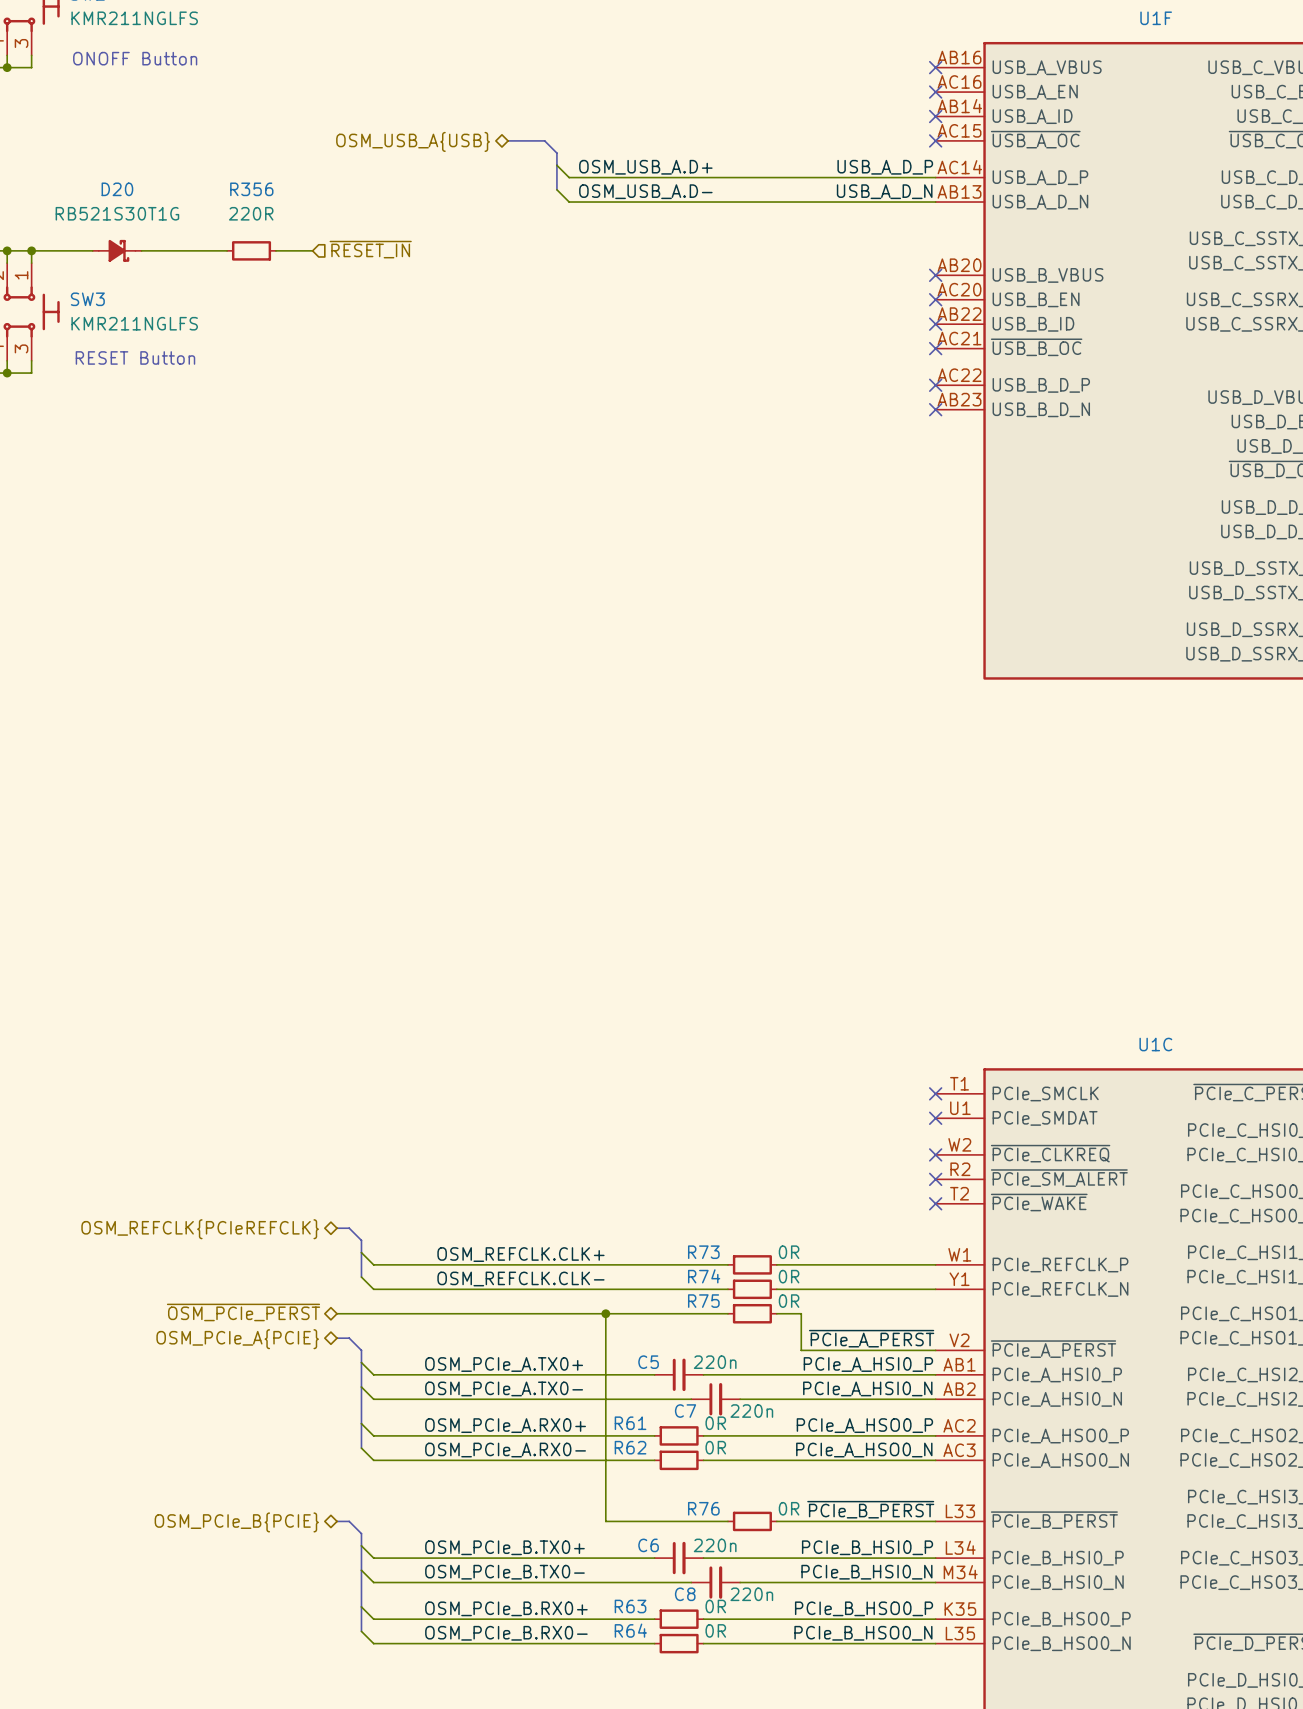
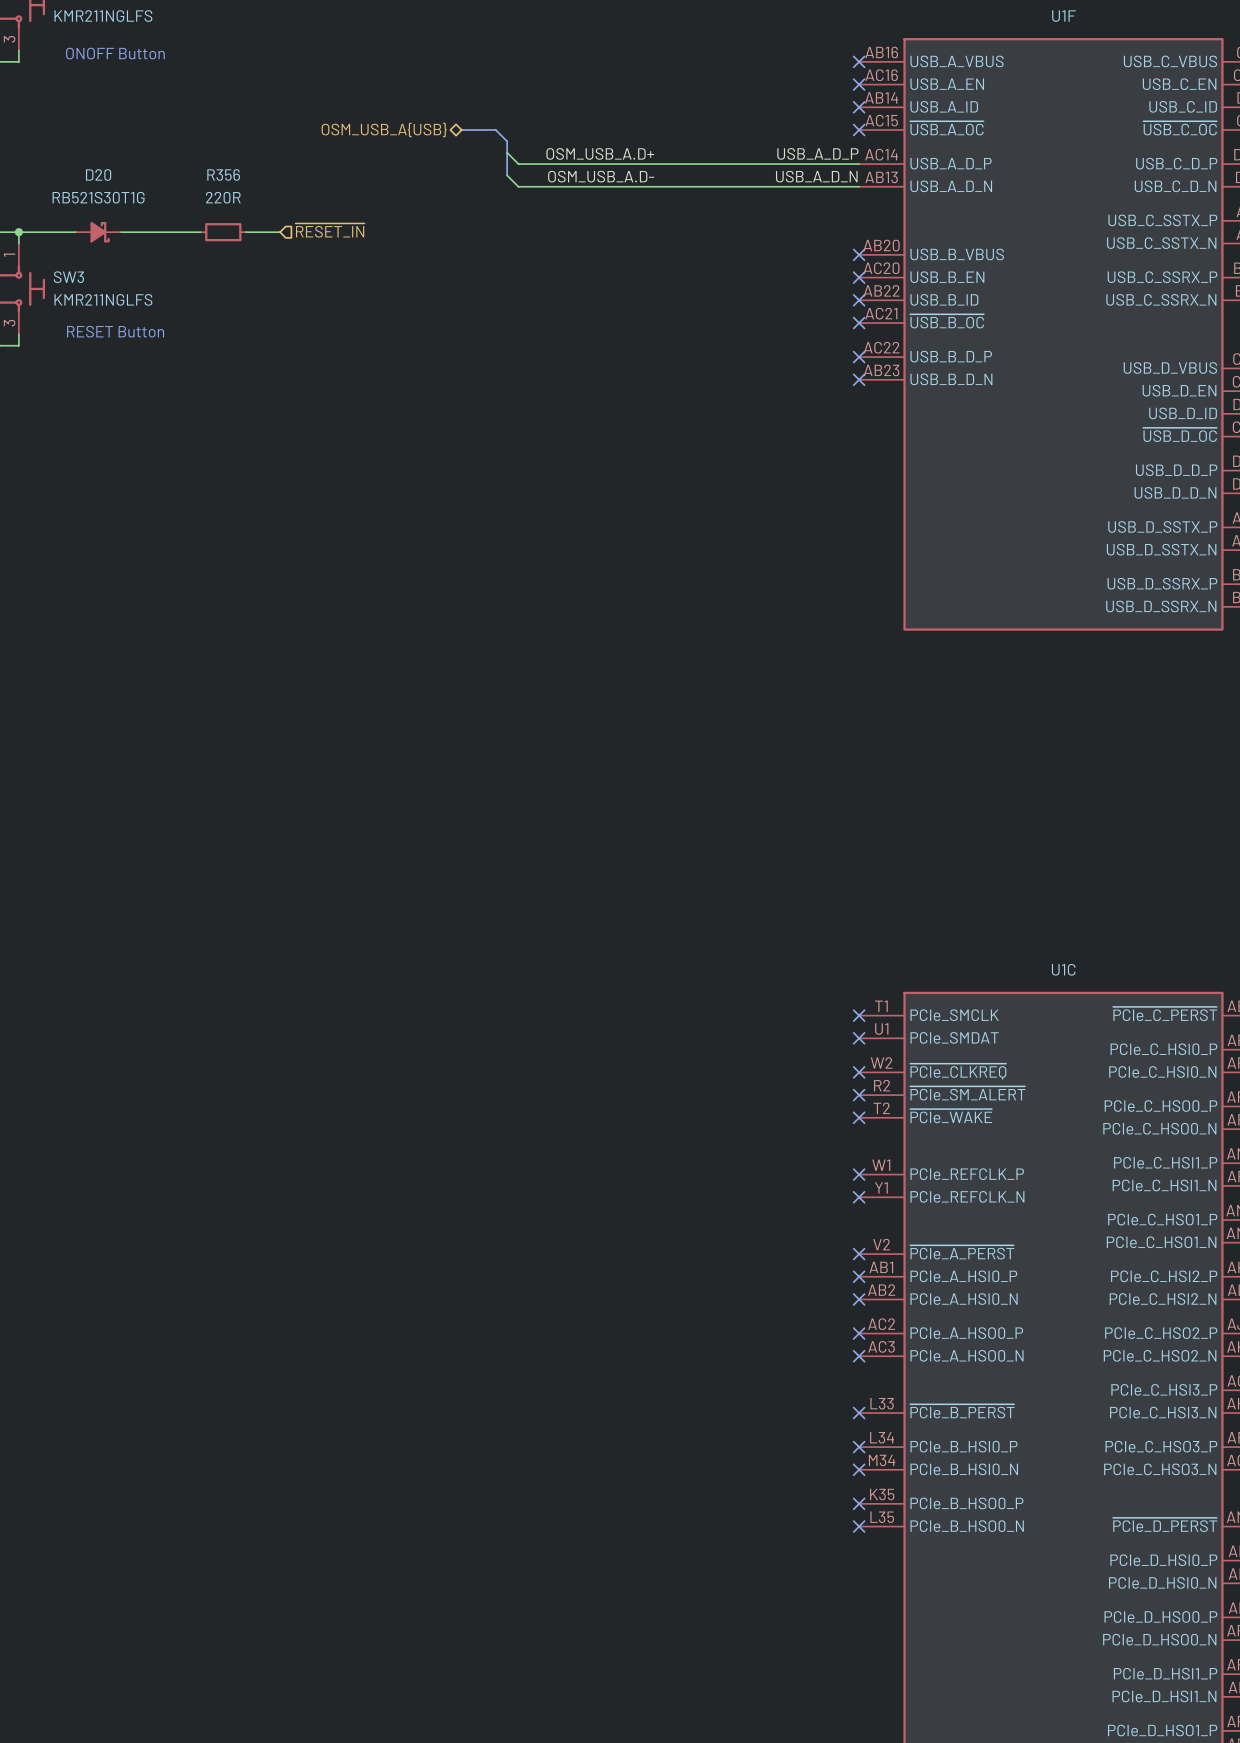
bus: (337, 1228) (349, 1228) (361, 1240) (361, 1277) -> none
hierarchical label: OSM_REFCLK{PCIeREFCLK} (200, 1229) -> none
wire: (361, 1252) (373, 1264) (727, 1264) -> none
label: OSM_REFCLK.CLK+ (520, 1254) -> none
R73: (752, 1264) -> none
wire: (776, 1264) (935, 1264) -> none
no-connect mark: none -> (859, 1174)
wire: (361, 1277) (373, 1289) (727, 1289) -> none
label: OSM_REFCLK.CLK- (520, 1278) -> none
R74: (752, 1289) -> none
wire: (776, 1289) (935, 1289) -> none
no-connect mark: none -> (859, 1197)
hierarchical label: ~{OSM_PCIe_PERST} (243, 1312) -> none
wire: (337, 1313) (727, 1313) -> none
wire: (605, 1313) (605, 1521) (727, 1521) -> none
junction: (605, 1313) -> none
R75: (752, 1313) -> none
wire: (776, 1313) (801, 1313) (801, 1350) (935, 1350) -> none
bus: (337, 1338) (349, 1338) (361, 1350) (361, 1448) -> none
label: ~{PCIe_A_PERST} (871, 1338) -> none
hierarchical label: OSM_PCIe_A{PCIE} (237, 1339) -> none
no-connect mark: none -> (859, 1254)
wire: (361, 1362) (373, 1374) (654, 1374) -> none
label: OSM_PCIe_A.TX0+ (504, 1364) -> none
label: PCIe_A_HSI0_P (868, 1364) -> none
C5: (679, 1374) -> none
wire: (703, 1374) (935, 1374) -> none
no-connect mark: none -> (859, 1276)
wire: (361, 1387) (373, 1399) (691, 1399) -> none
label: OSM_PCIe_A.TX0- (504, 1388) -> none
label: PCIe_A_HSI0_N (867, 1388) -> none
C7: (715, 1399) -> none
wire: (740, 1399) (935, 1399) -> none
no-connect mark: none -> (859, 1299)
wire: (361, 1423) (373, 1435) (654, 1435) -> none
label: OSM_PCIe_A.RX0+ (505, 1425) -> none
label: PCIe_A_HSO0_P (864, 1425) -> none
R61: (679, 1435) -> none
wire: (703, 1435) (935, 1435) -> none
no-connect mark: none -> (859, 1333)
wire: (361, 1448) (373, 1460) (654, 1460) -> none
label: OSM_PCIe_A.RX0- (505, 1450) -> none
label: PCIe_A_HSO0_N (864, 1450) -> none
R62: (679, 1460) -> none
wire: (703, 1460) (935, 1460) -> none
no-connect mark: none -> (859, 1356)
label: ~{PCIe_B_PERST} (870, 1509) -> none
bus: (337, 1521) (349, 1521) (361, 1533) (361, 1631) -> none
R76: (752, 1521) -> none
wire: (776, 1521) (935, 1521) -> none
no-connect mark: none -> (859, 1413)
hierarchical label: OSM_PCIe_B{PCIE} (236, 1522) -> none
wire: (361, 1545) (373, 1558) (654, 1558) -> none
label: OSM_PCIe_B.TX0+ (504, 1547) -> none
label: PCIe_B_HSI0_P (867, 1547) -> none
C6: (679, 1558) -> none
wire: (703, 1558) (935, 1558) -> none
no-connect mark: none -> (859, 1447)
wire: (361, 1570) (373, 1582) (691, 1582) -> none
label: OSM_PCIe_B.TX0- (504, 1572) -> none
label: PCIe_B_HSI0_N (866, 1572) -> none
C8: (715, 1582) -> none
wire: (740, 1582) (935, 1582) -> none
no-connect mark: none -> (859, 1469)
wire: (361, 1606) (373, 1619) (654, 1619) -> none
label: OSM_PCIe_B.RX0+ (506, 1608) -> none
label: PCIe_B_HSO0_P (864, 1608) -> none
R63: (679, 1619) -> none
wire: (703, 1619) (935, 1619) -> none
no-connect mark: none -> (859, 1503)
wire: (361, 1631) (373, 1643) (654, 1643) -> none
label: OSM_PCIe_B.RX0- (506, 1633) -> none
label: PCIe_B_HSO0_N (863, 1633) -> none
R64: (679, 1643) -> none
wire: (703, 1643) (935, 1643) -> none
no-connect mark: none -> (859, 1526)

